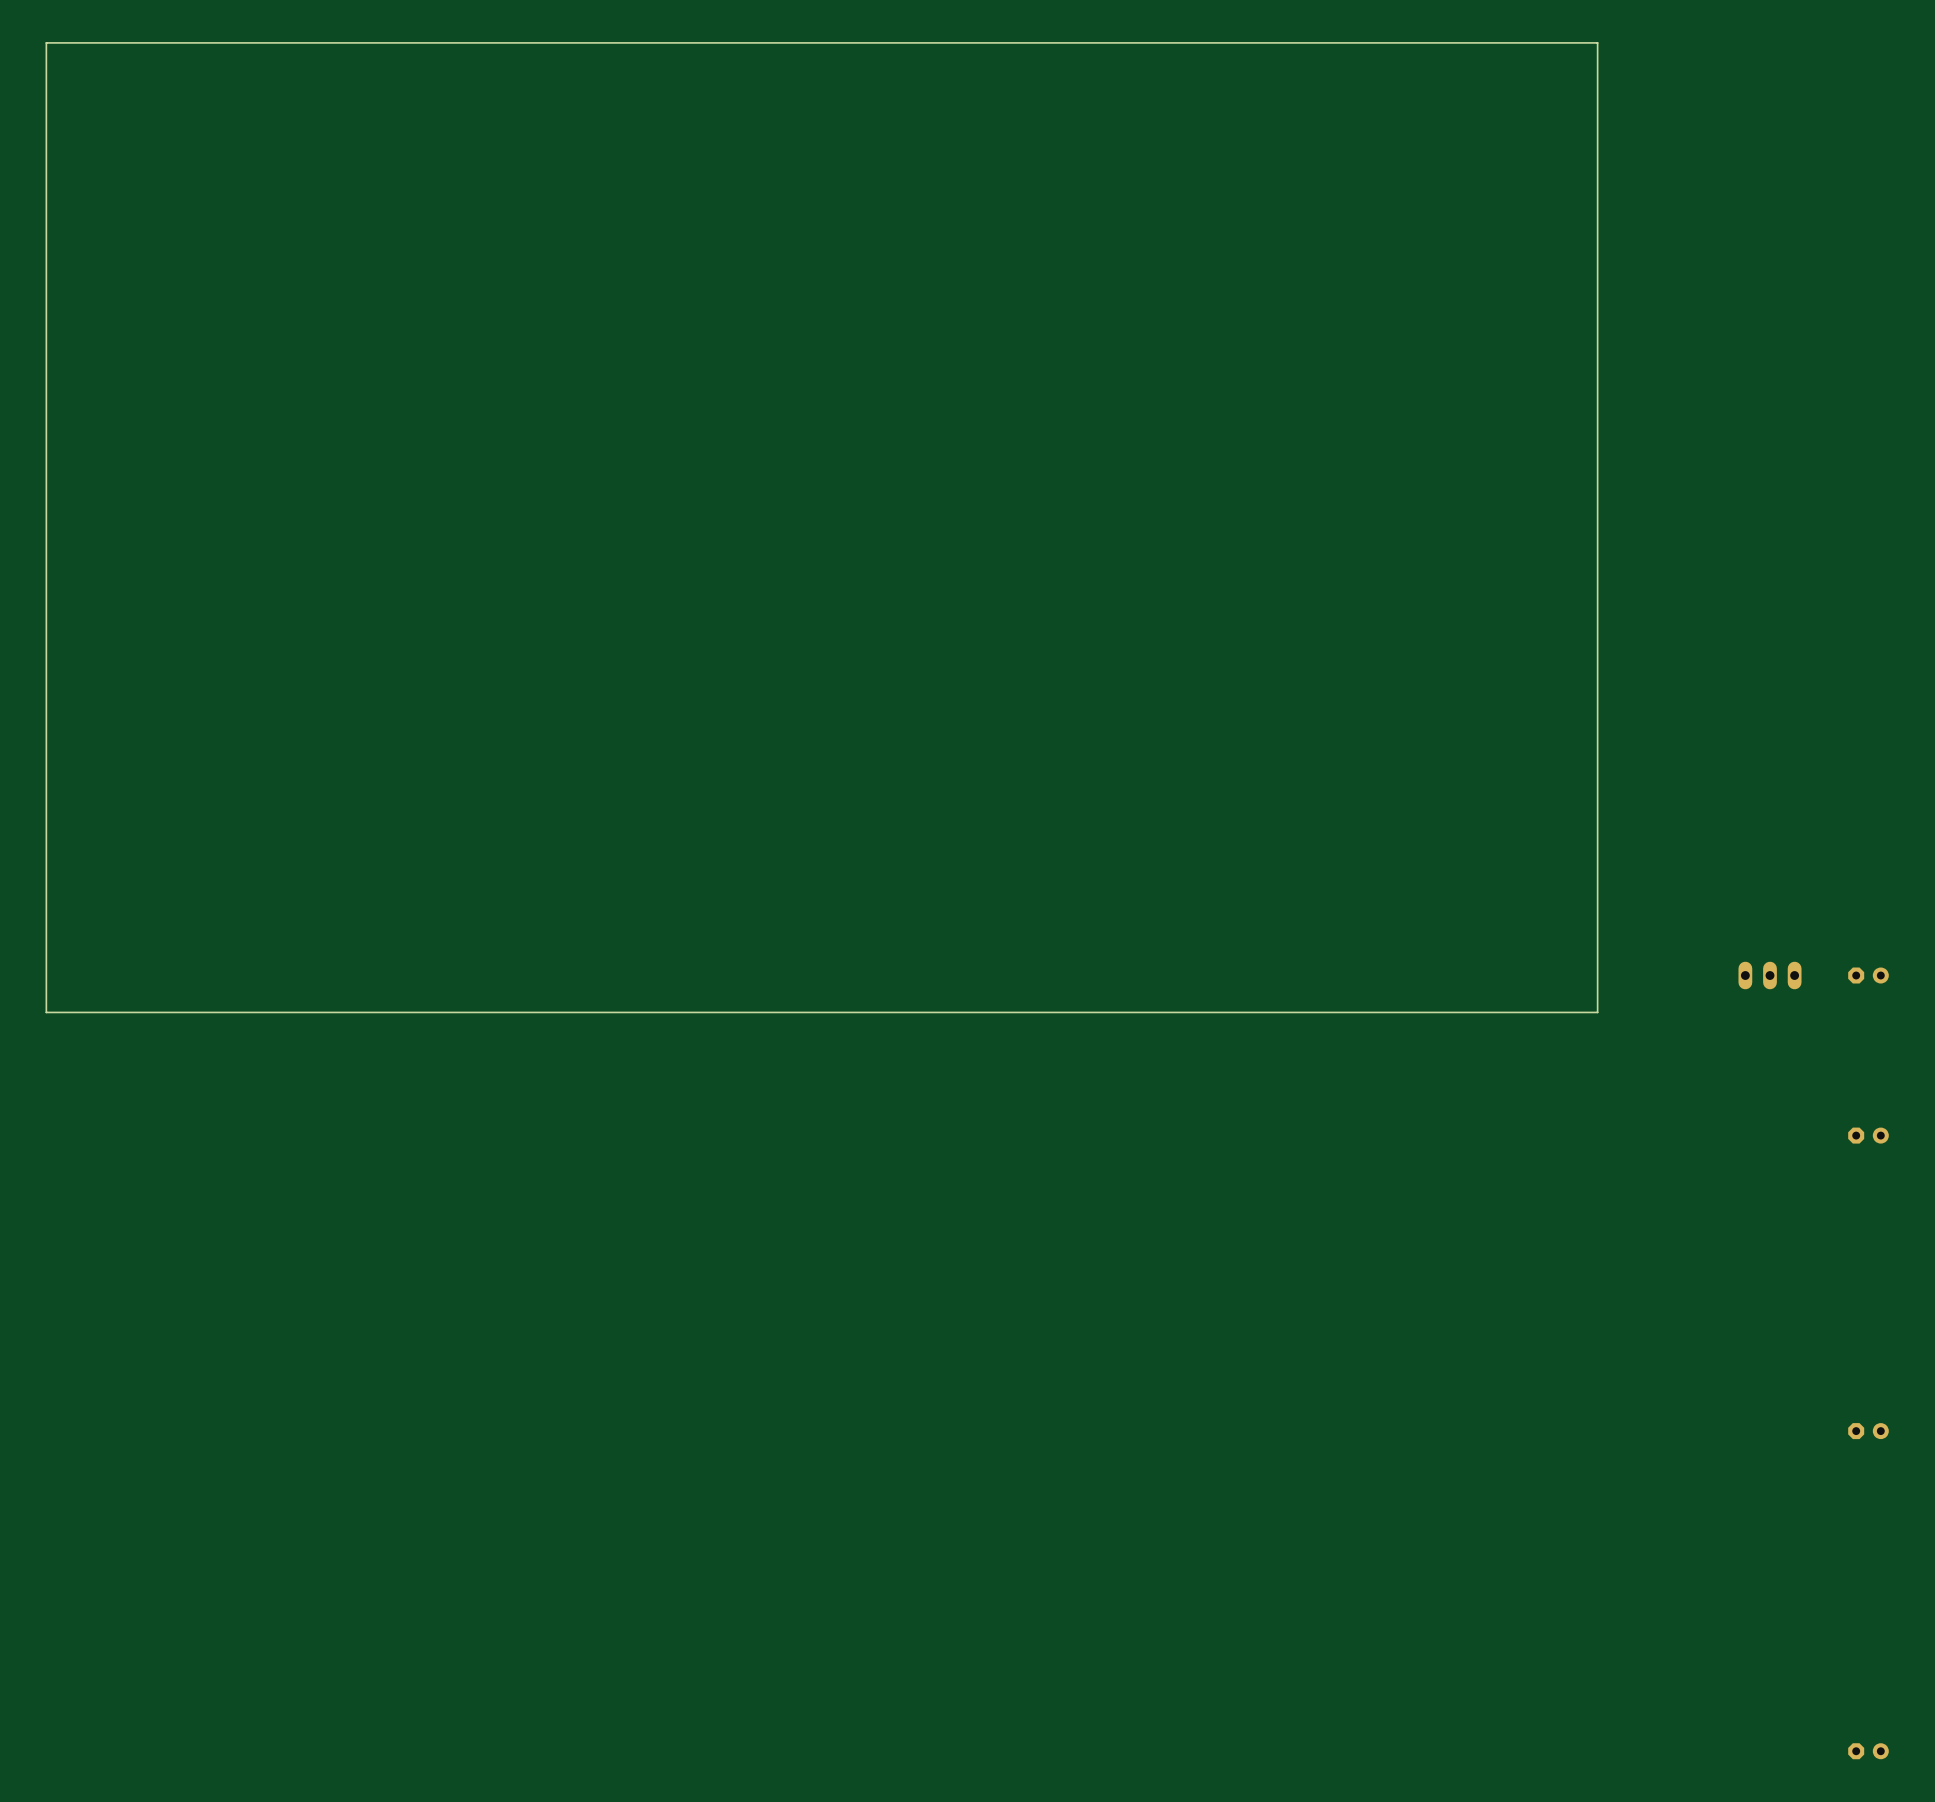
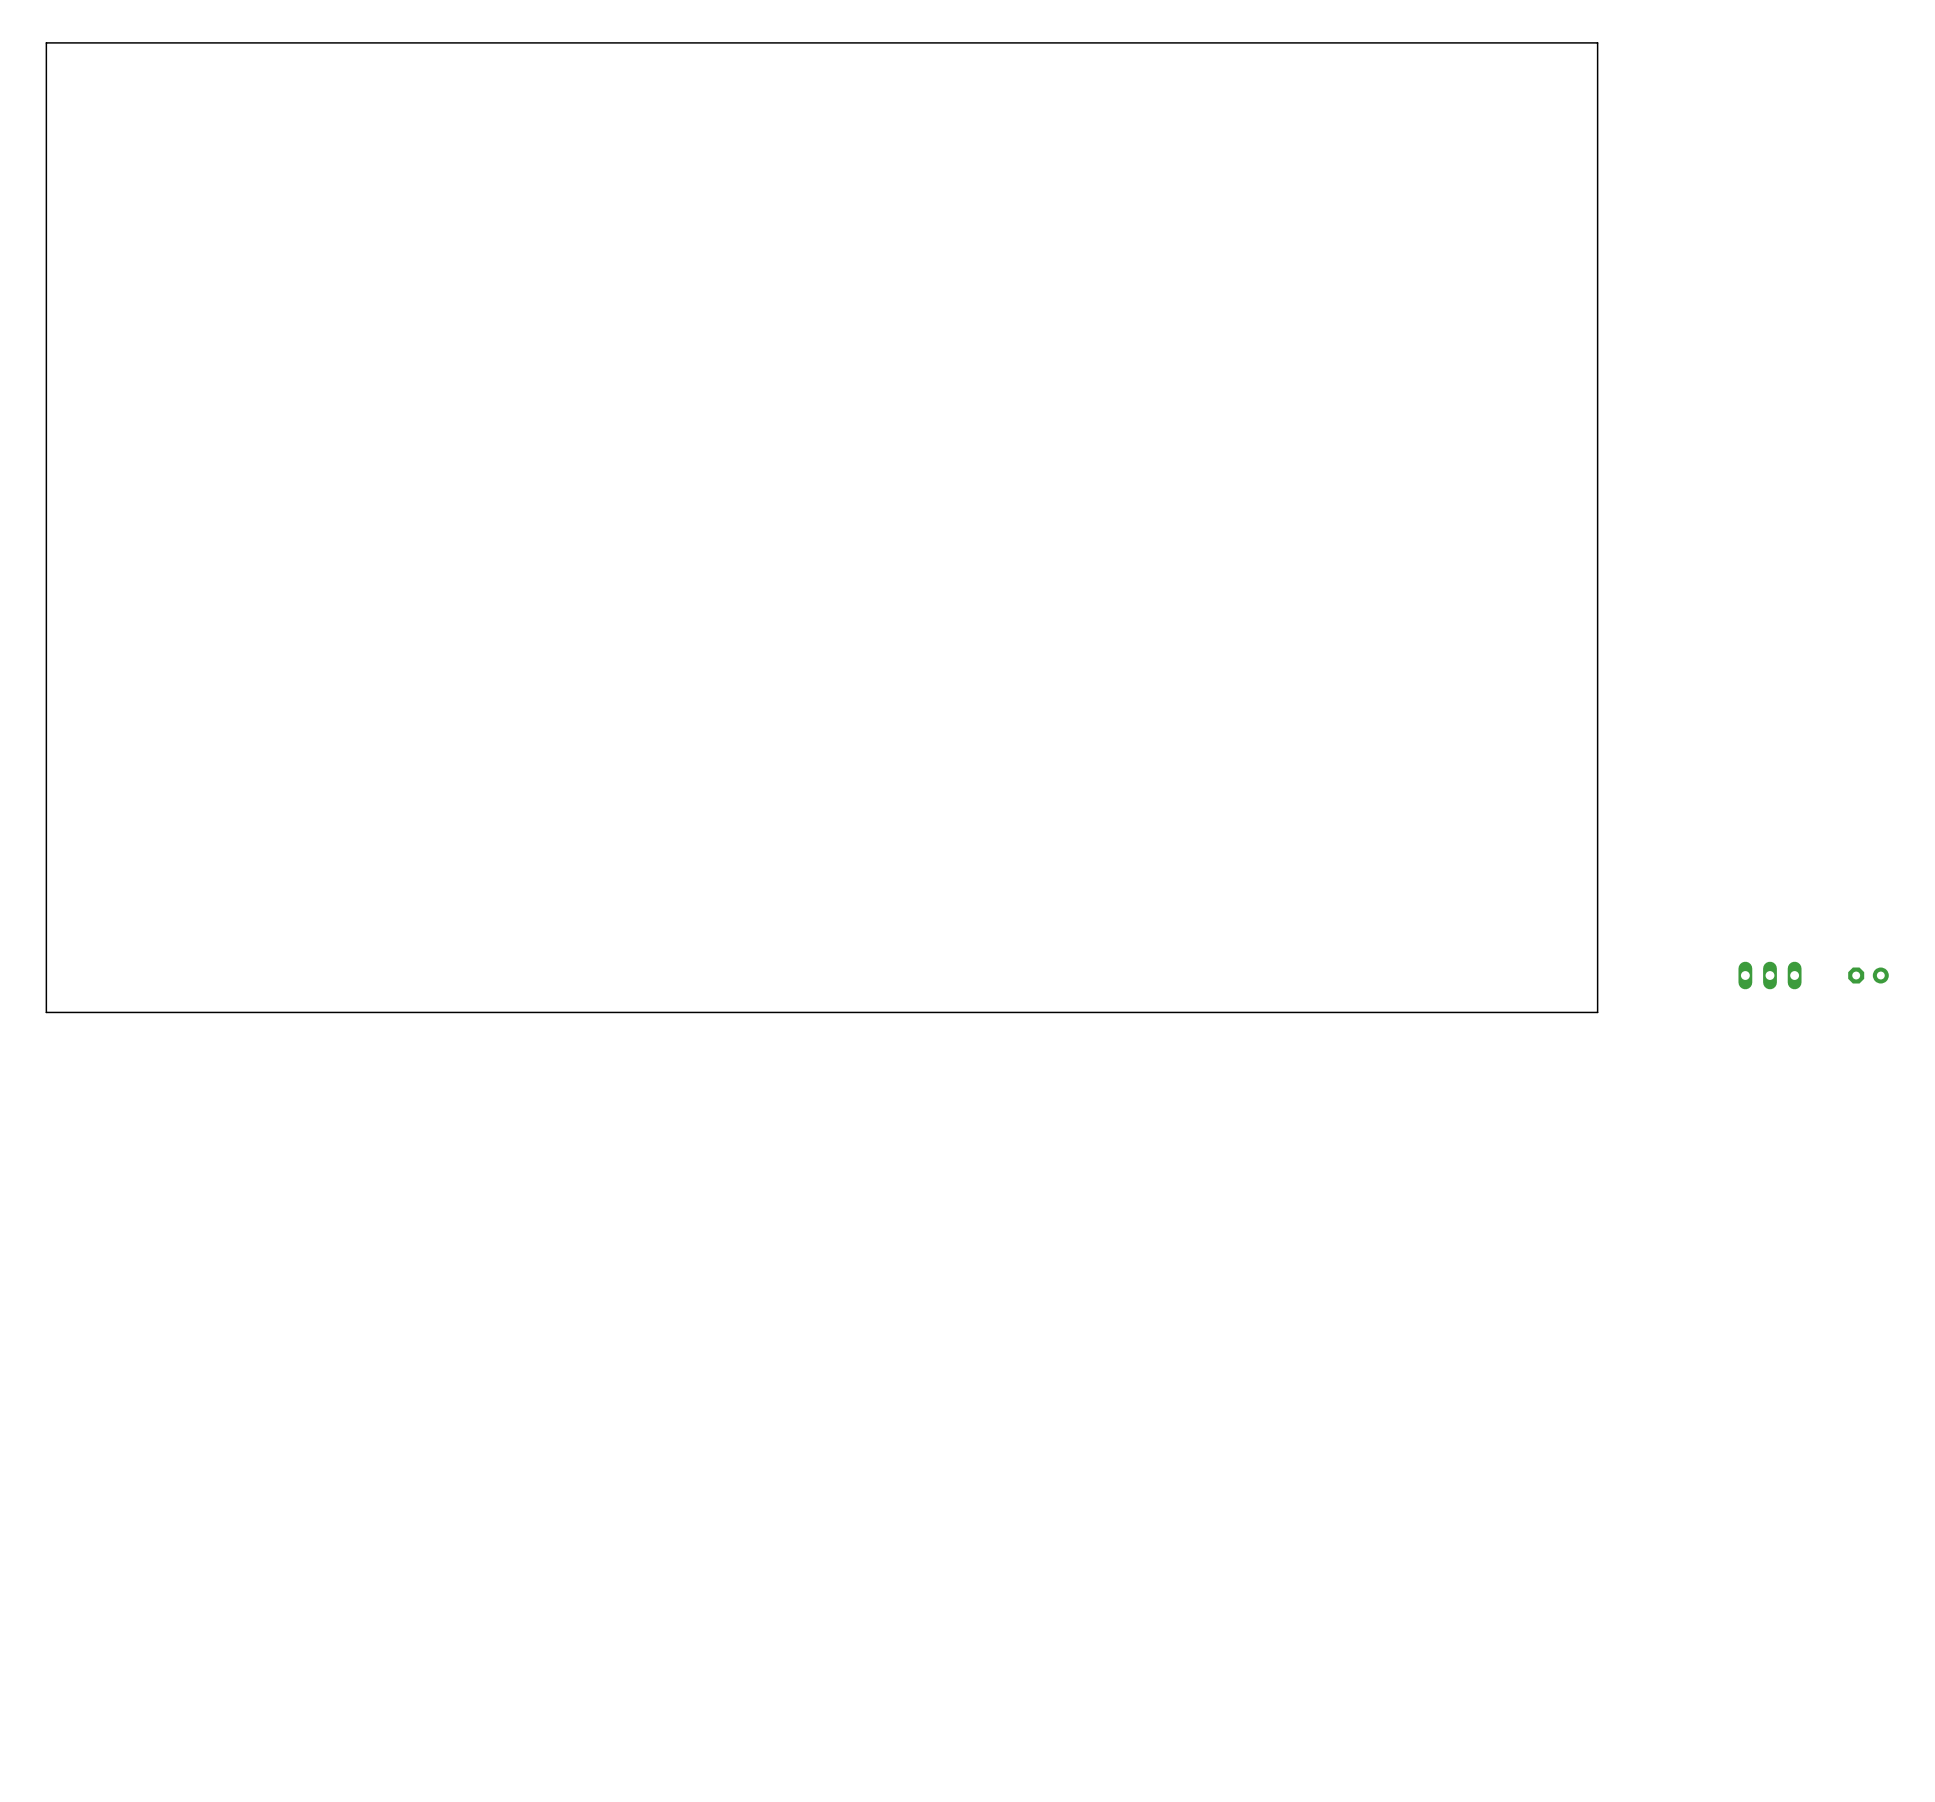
part: (1868, 1135) -> none
part: (1868, 1431) -> none
part: (1868, 1751) -> none

